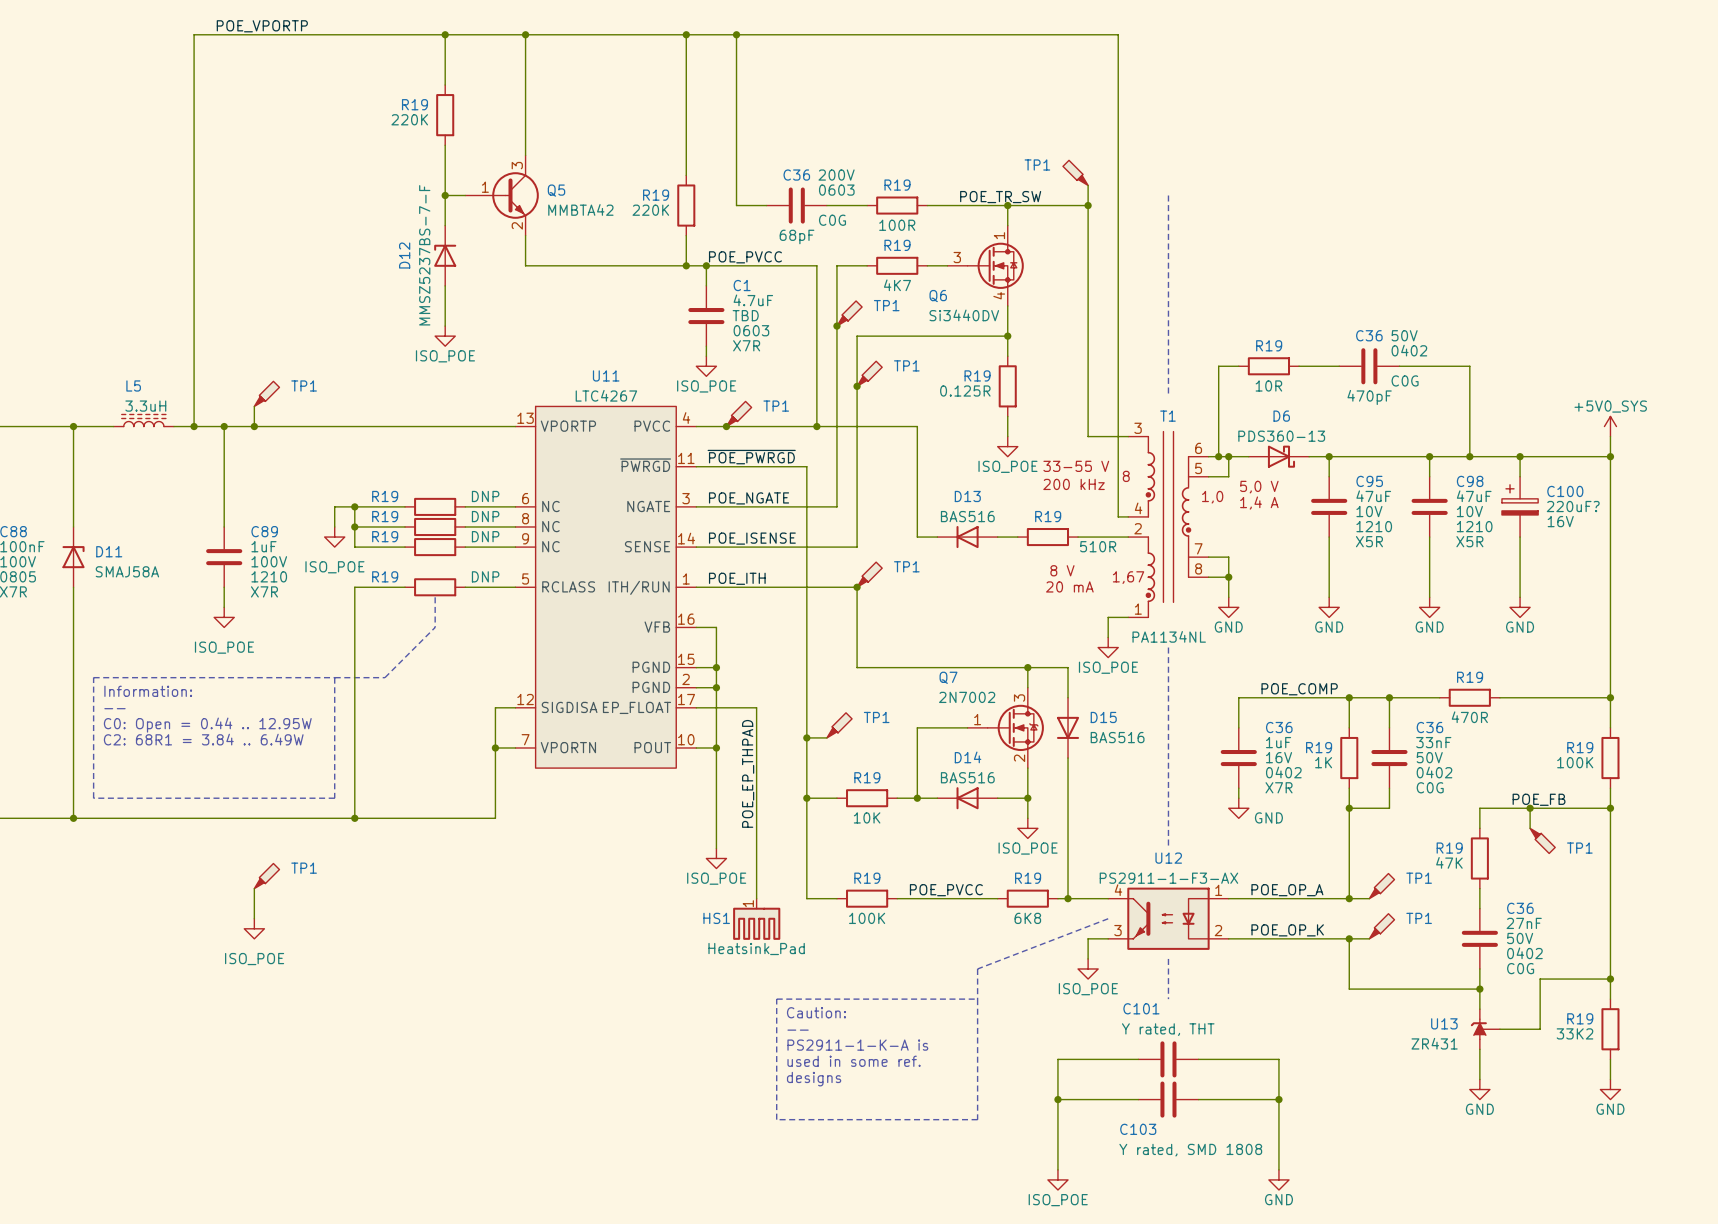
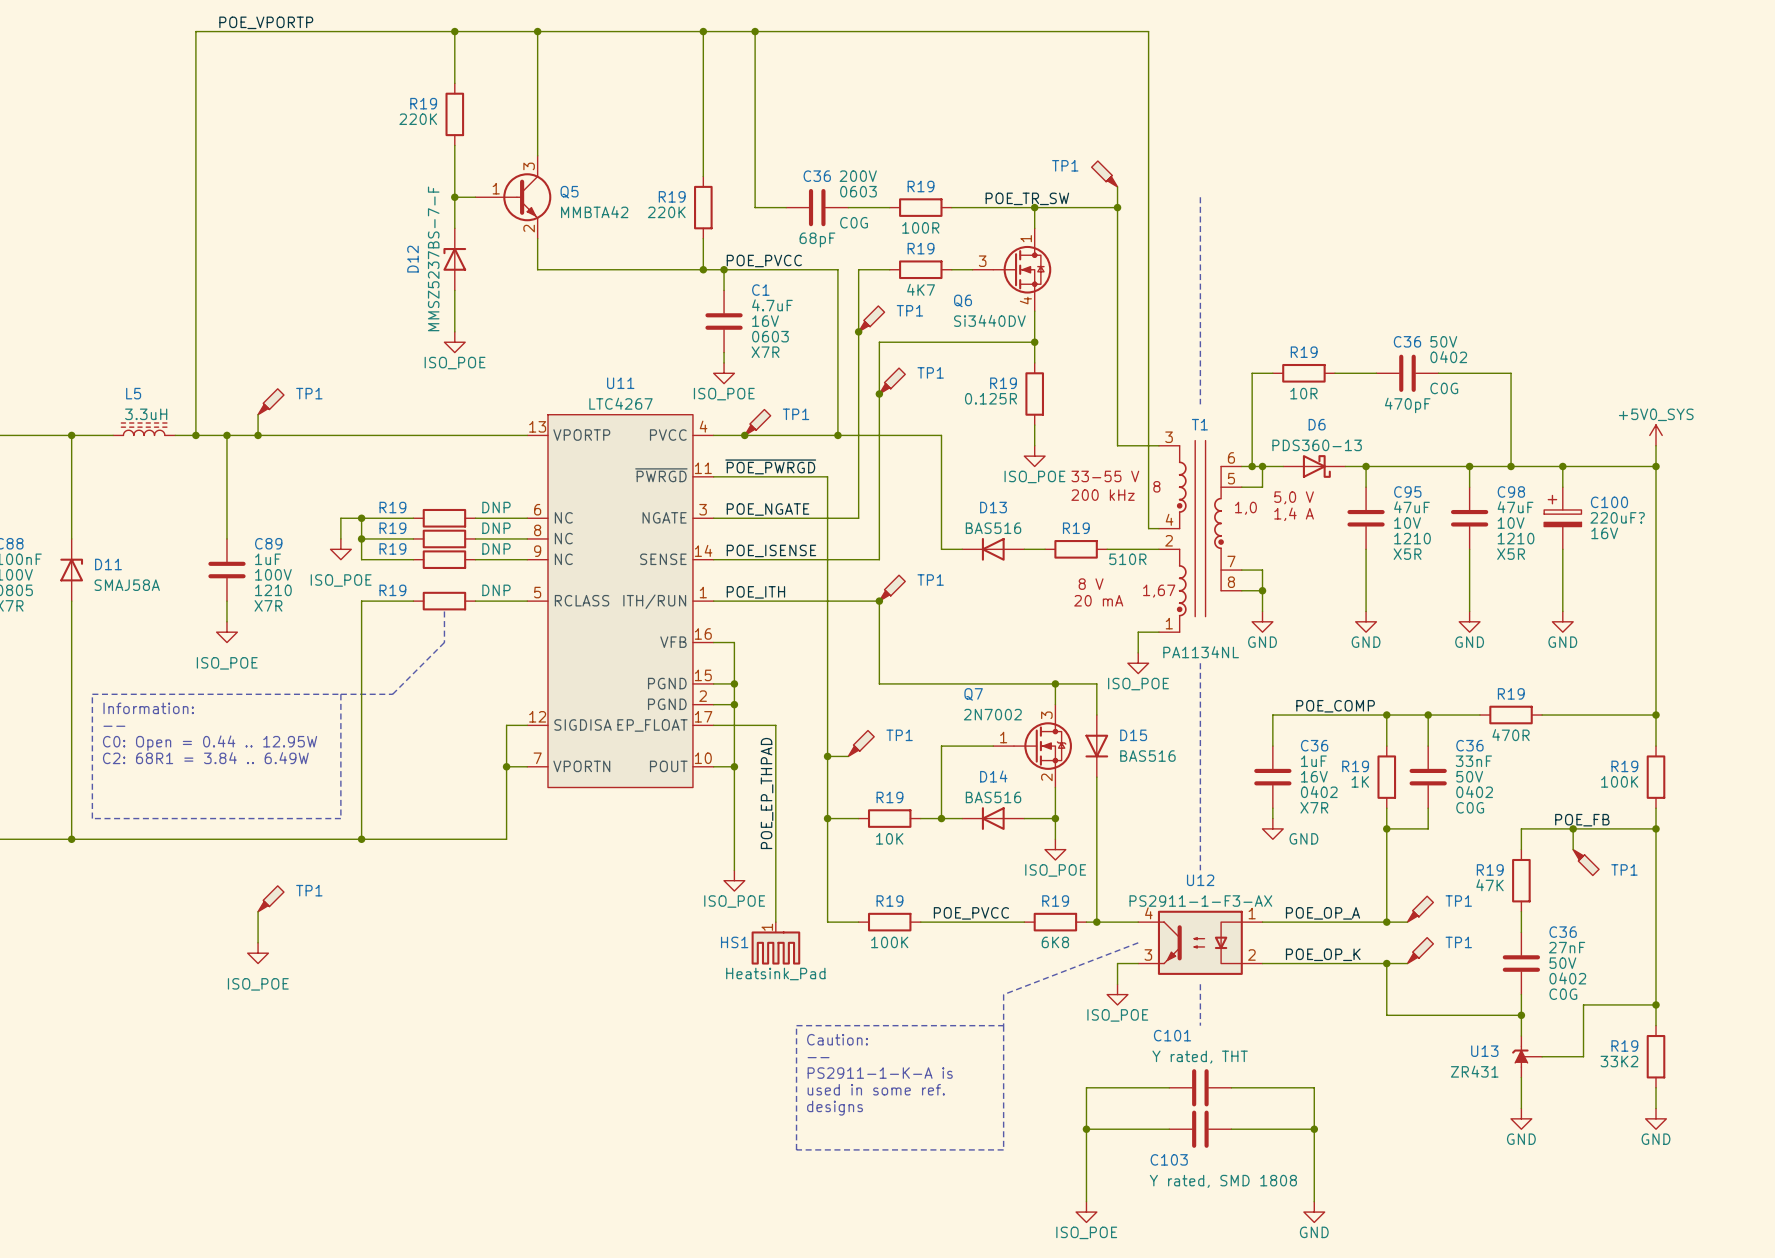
C1 text: TBD (745, 315) -> 16V (765, 321)

